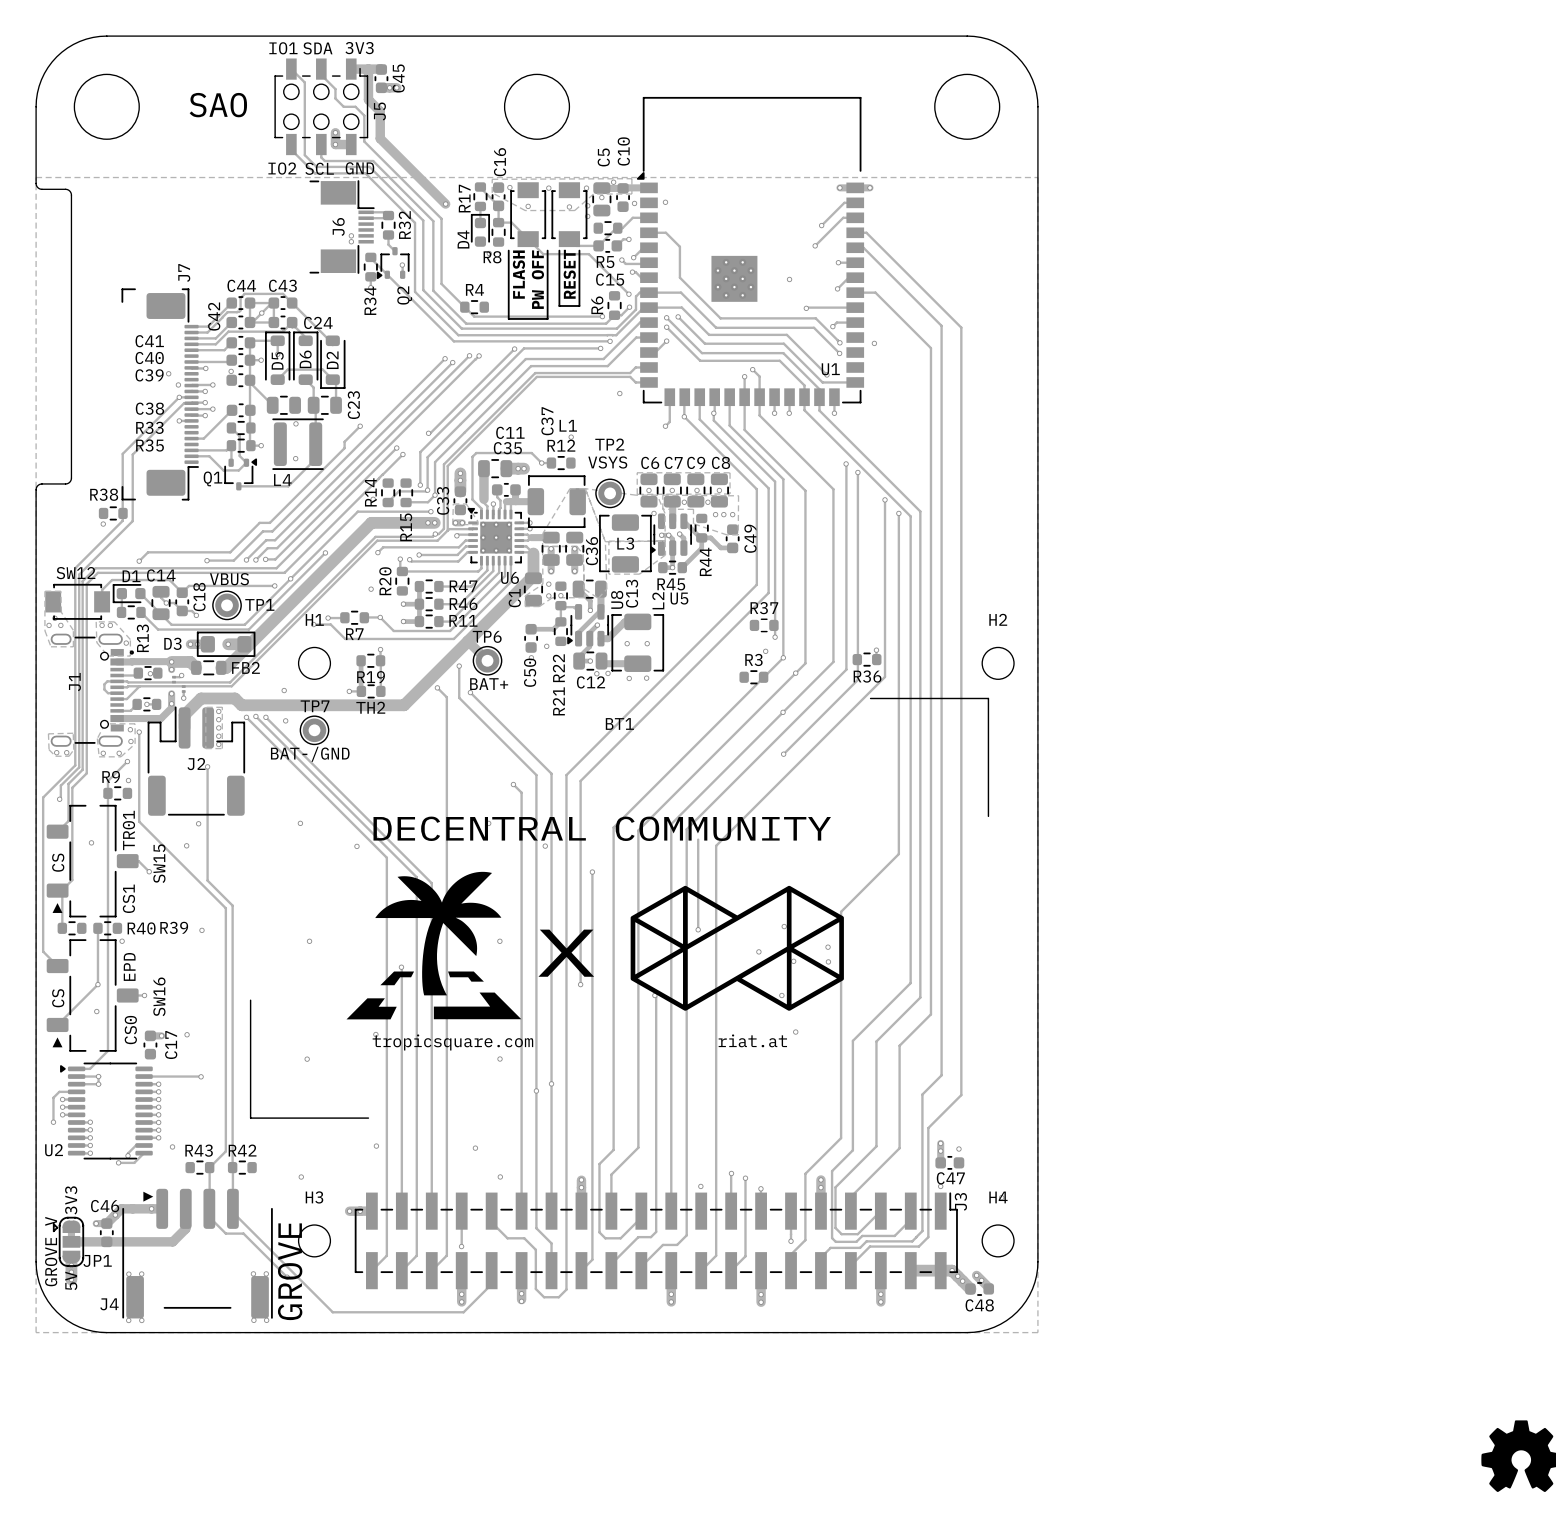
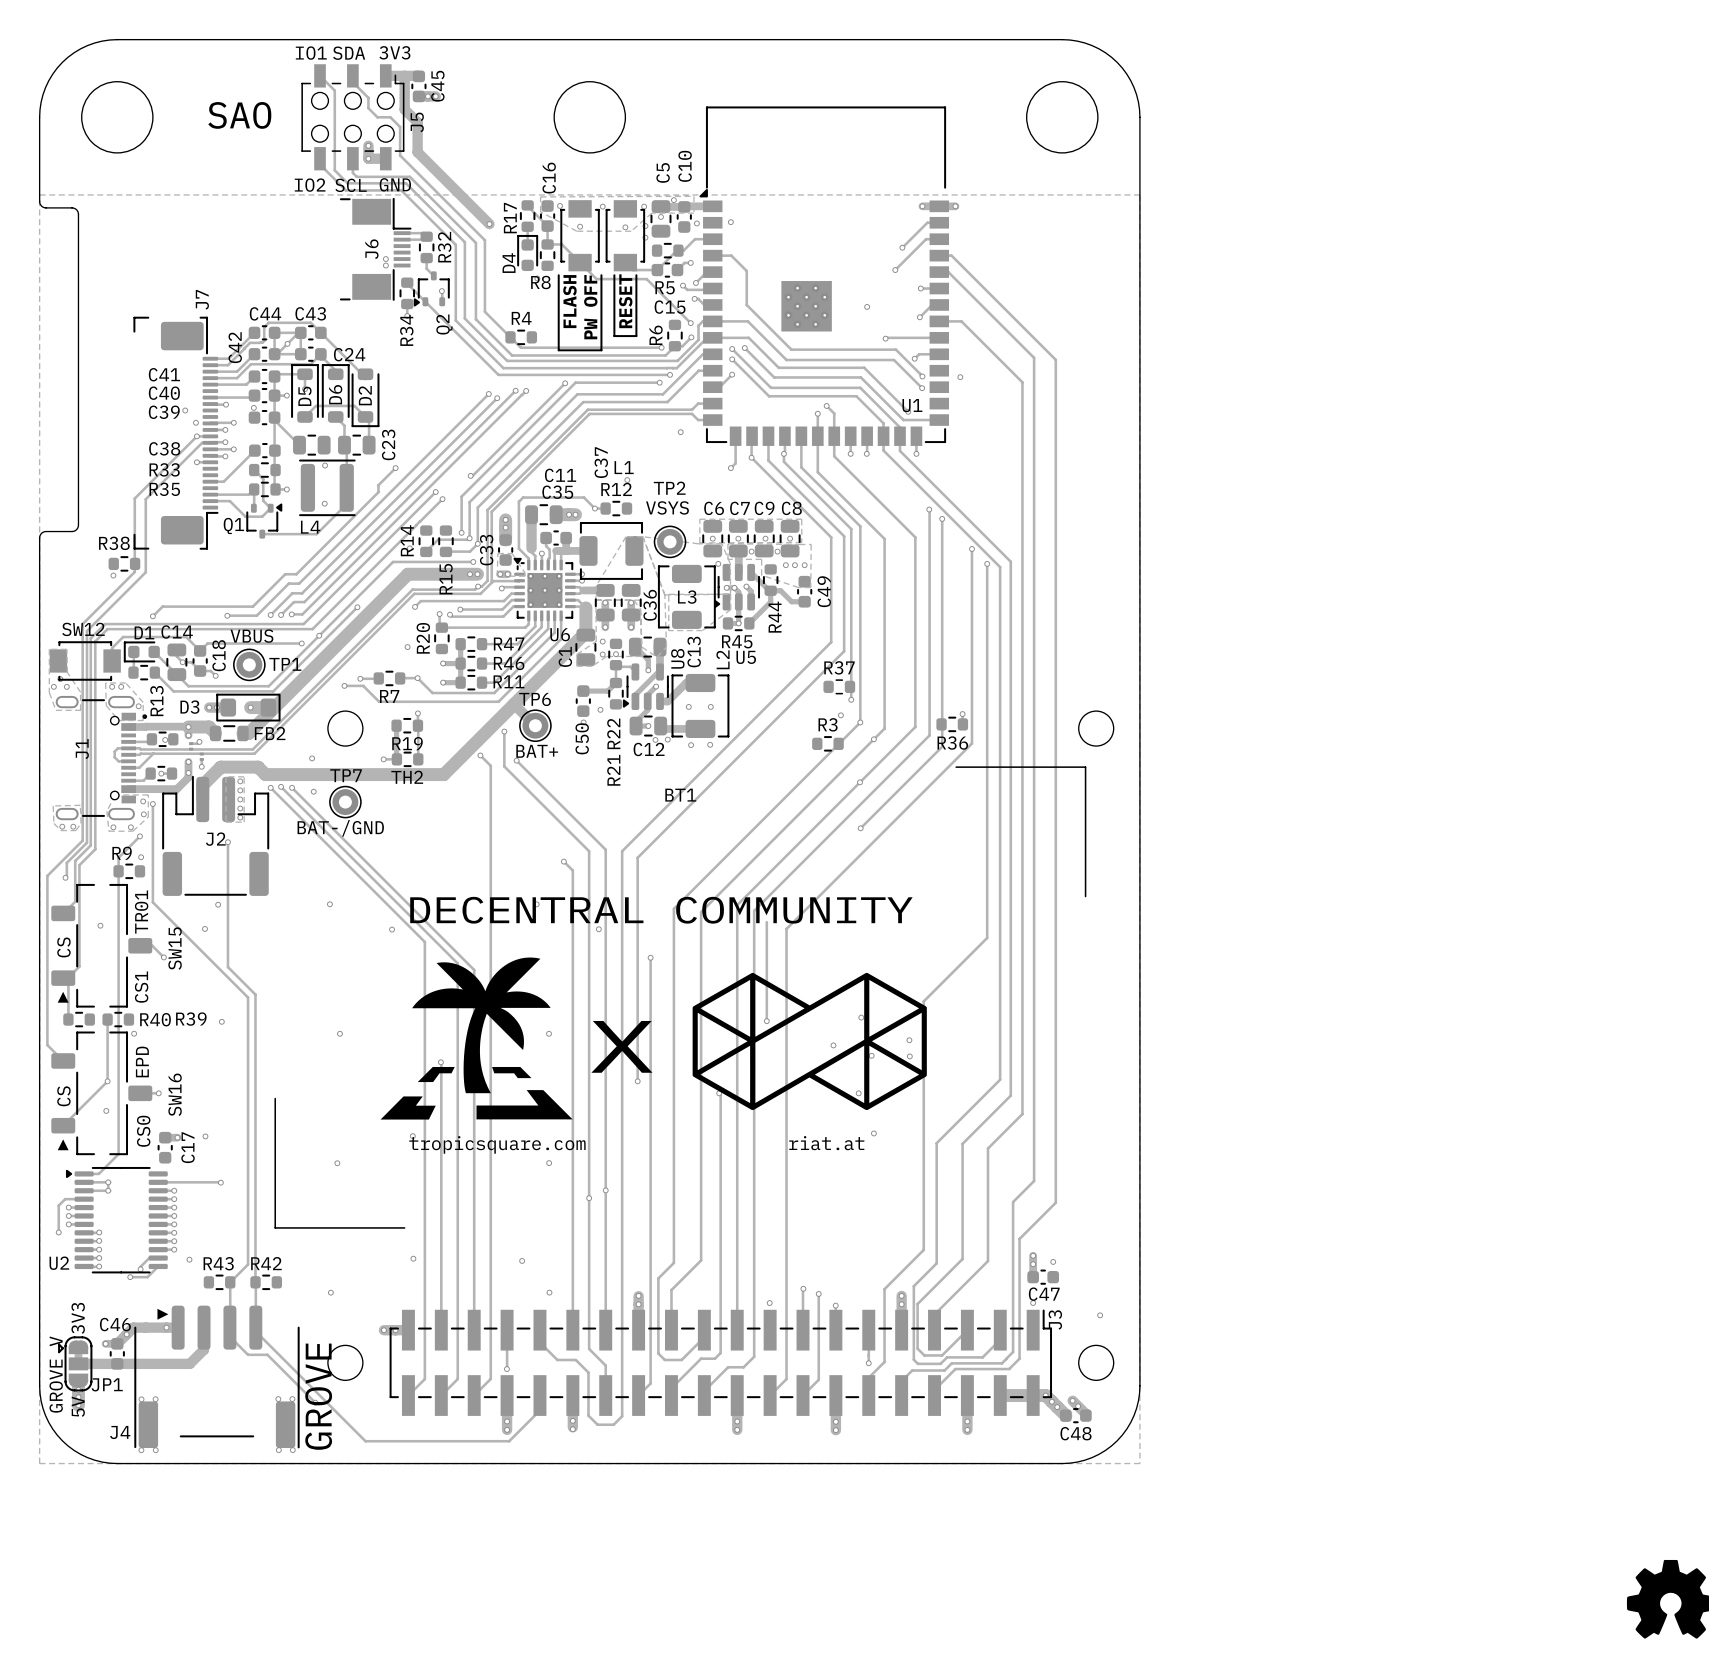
H1 name: H1 (314, 619) -> none
H2 name: H2 (998, 619) -> none
H3 name: H3 (314, 1197) -> none
H4 name: H4 (998, 1197) -> none

